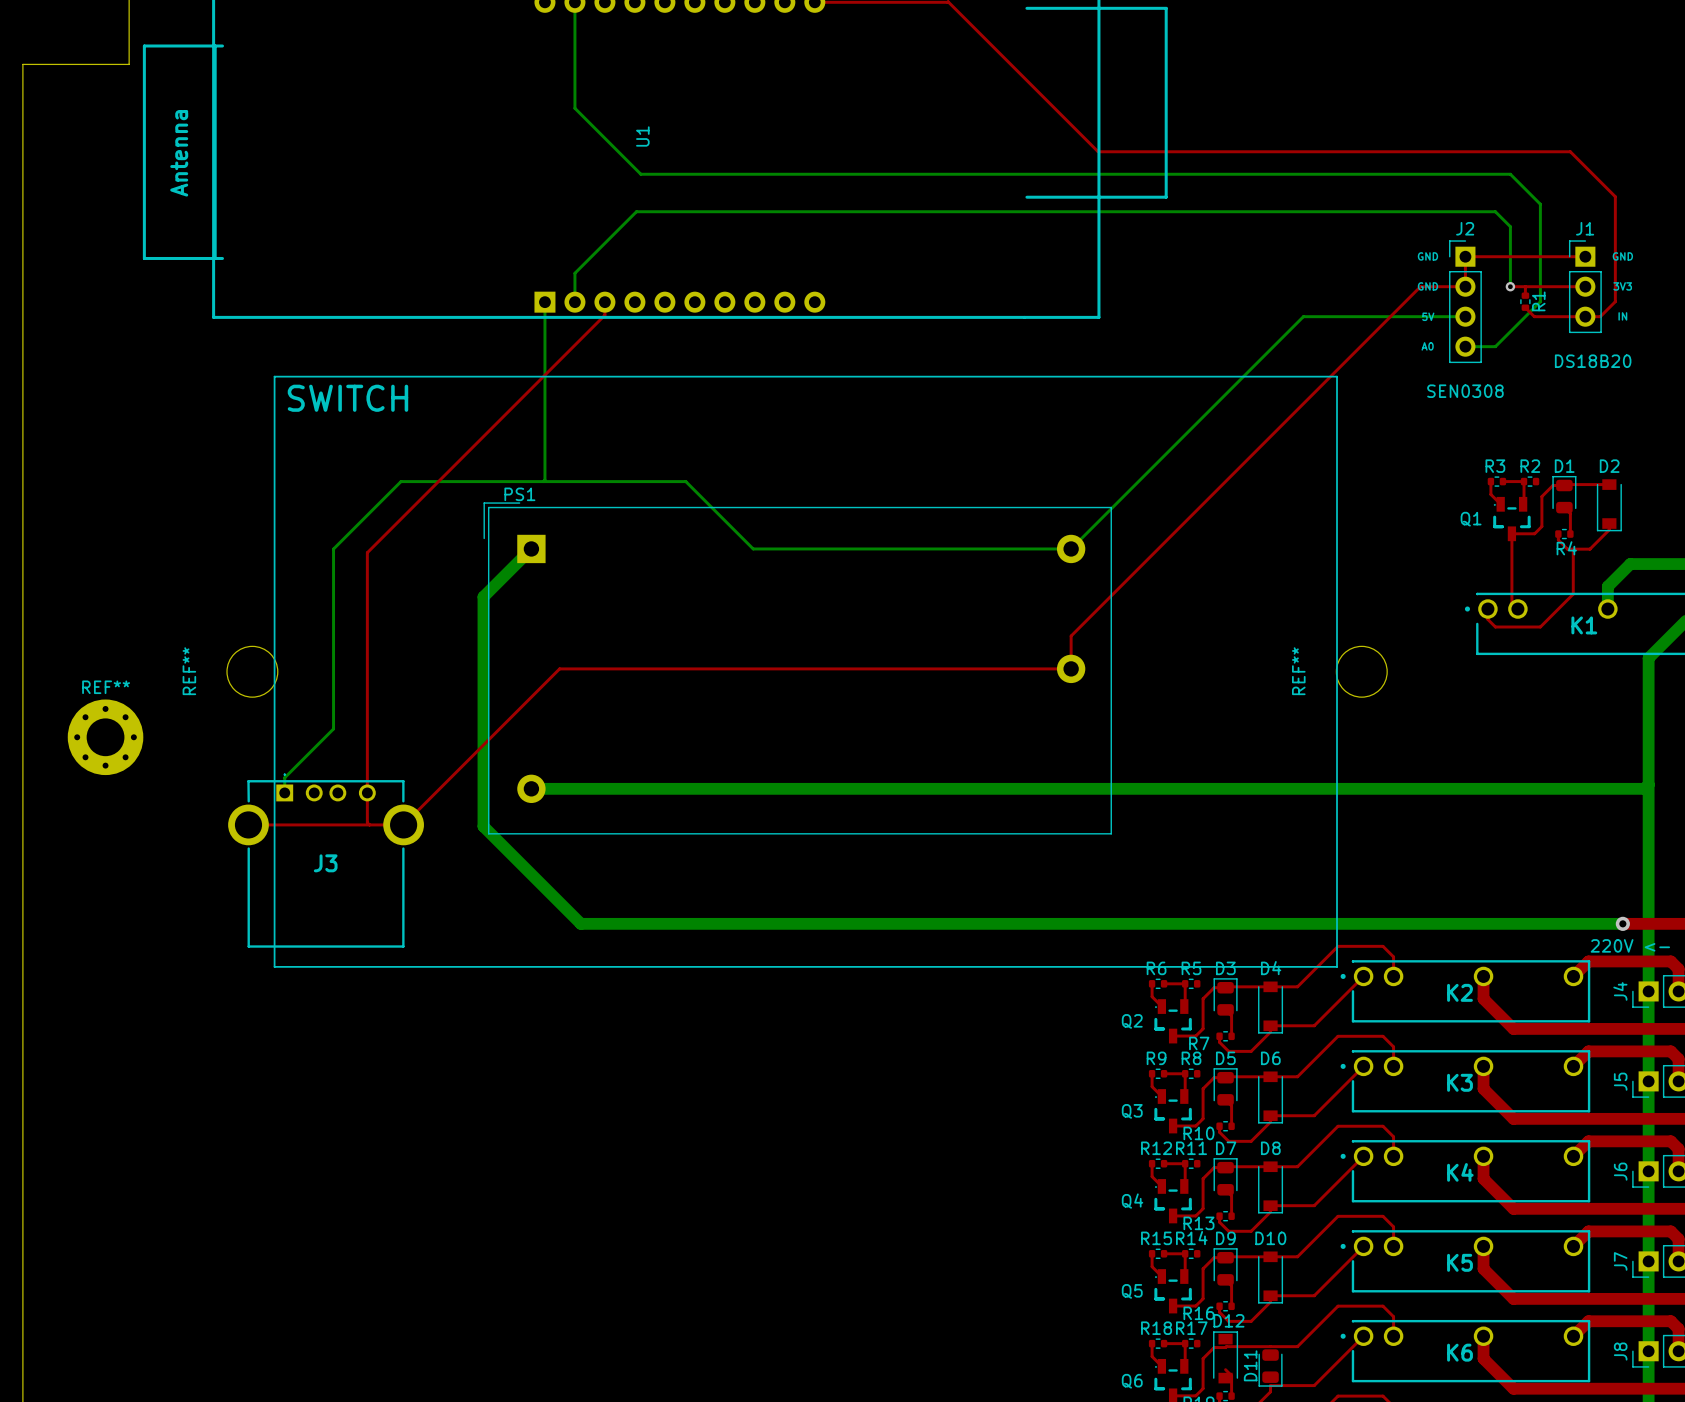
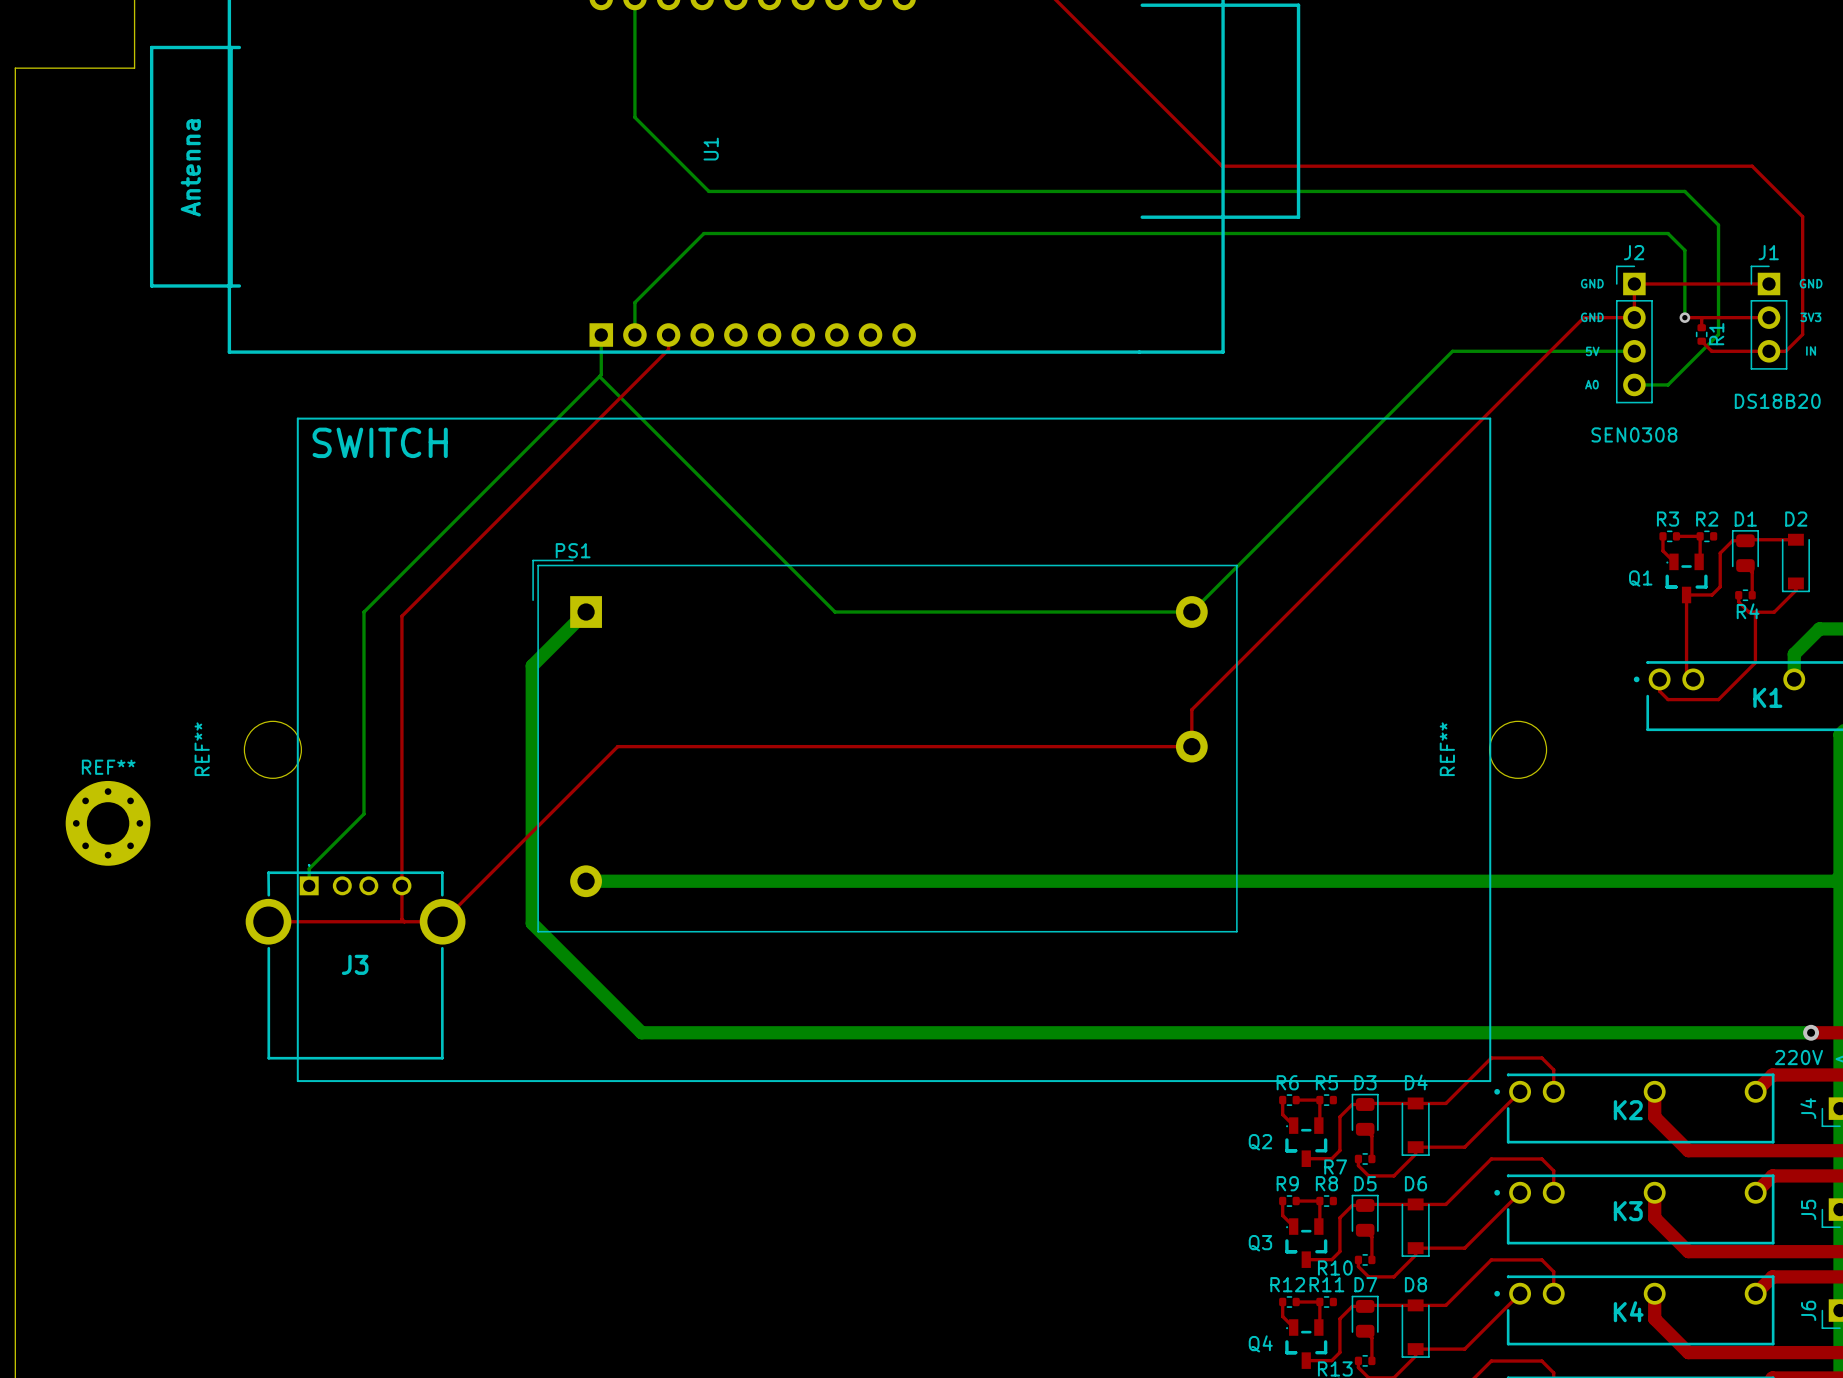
bottom track: (544, 337) (544, 480) (543, 481) -> (601, 374) (439, 536)
bottom track: (401, 481) (685, 481) -> (599, 376) (759, 536)

